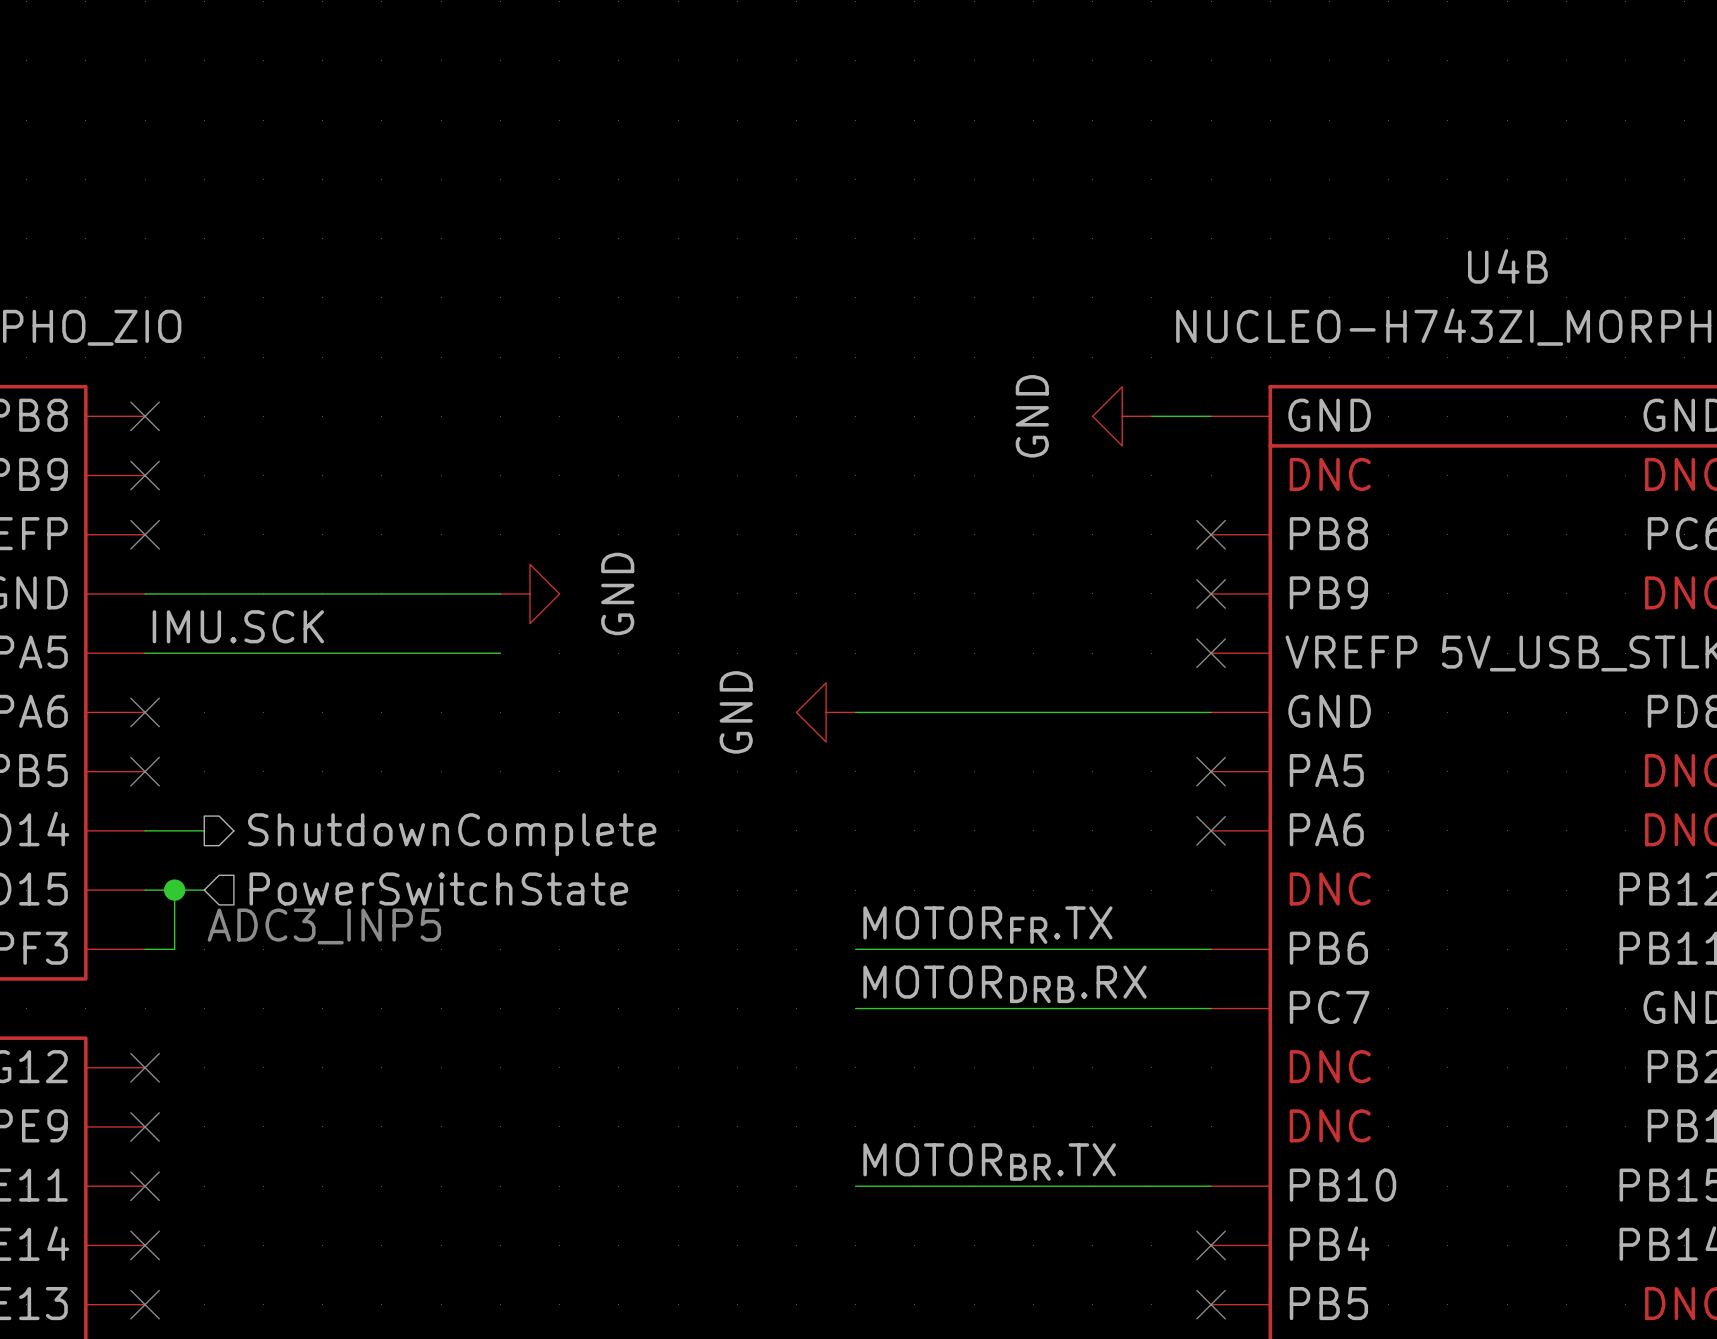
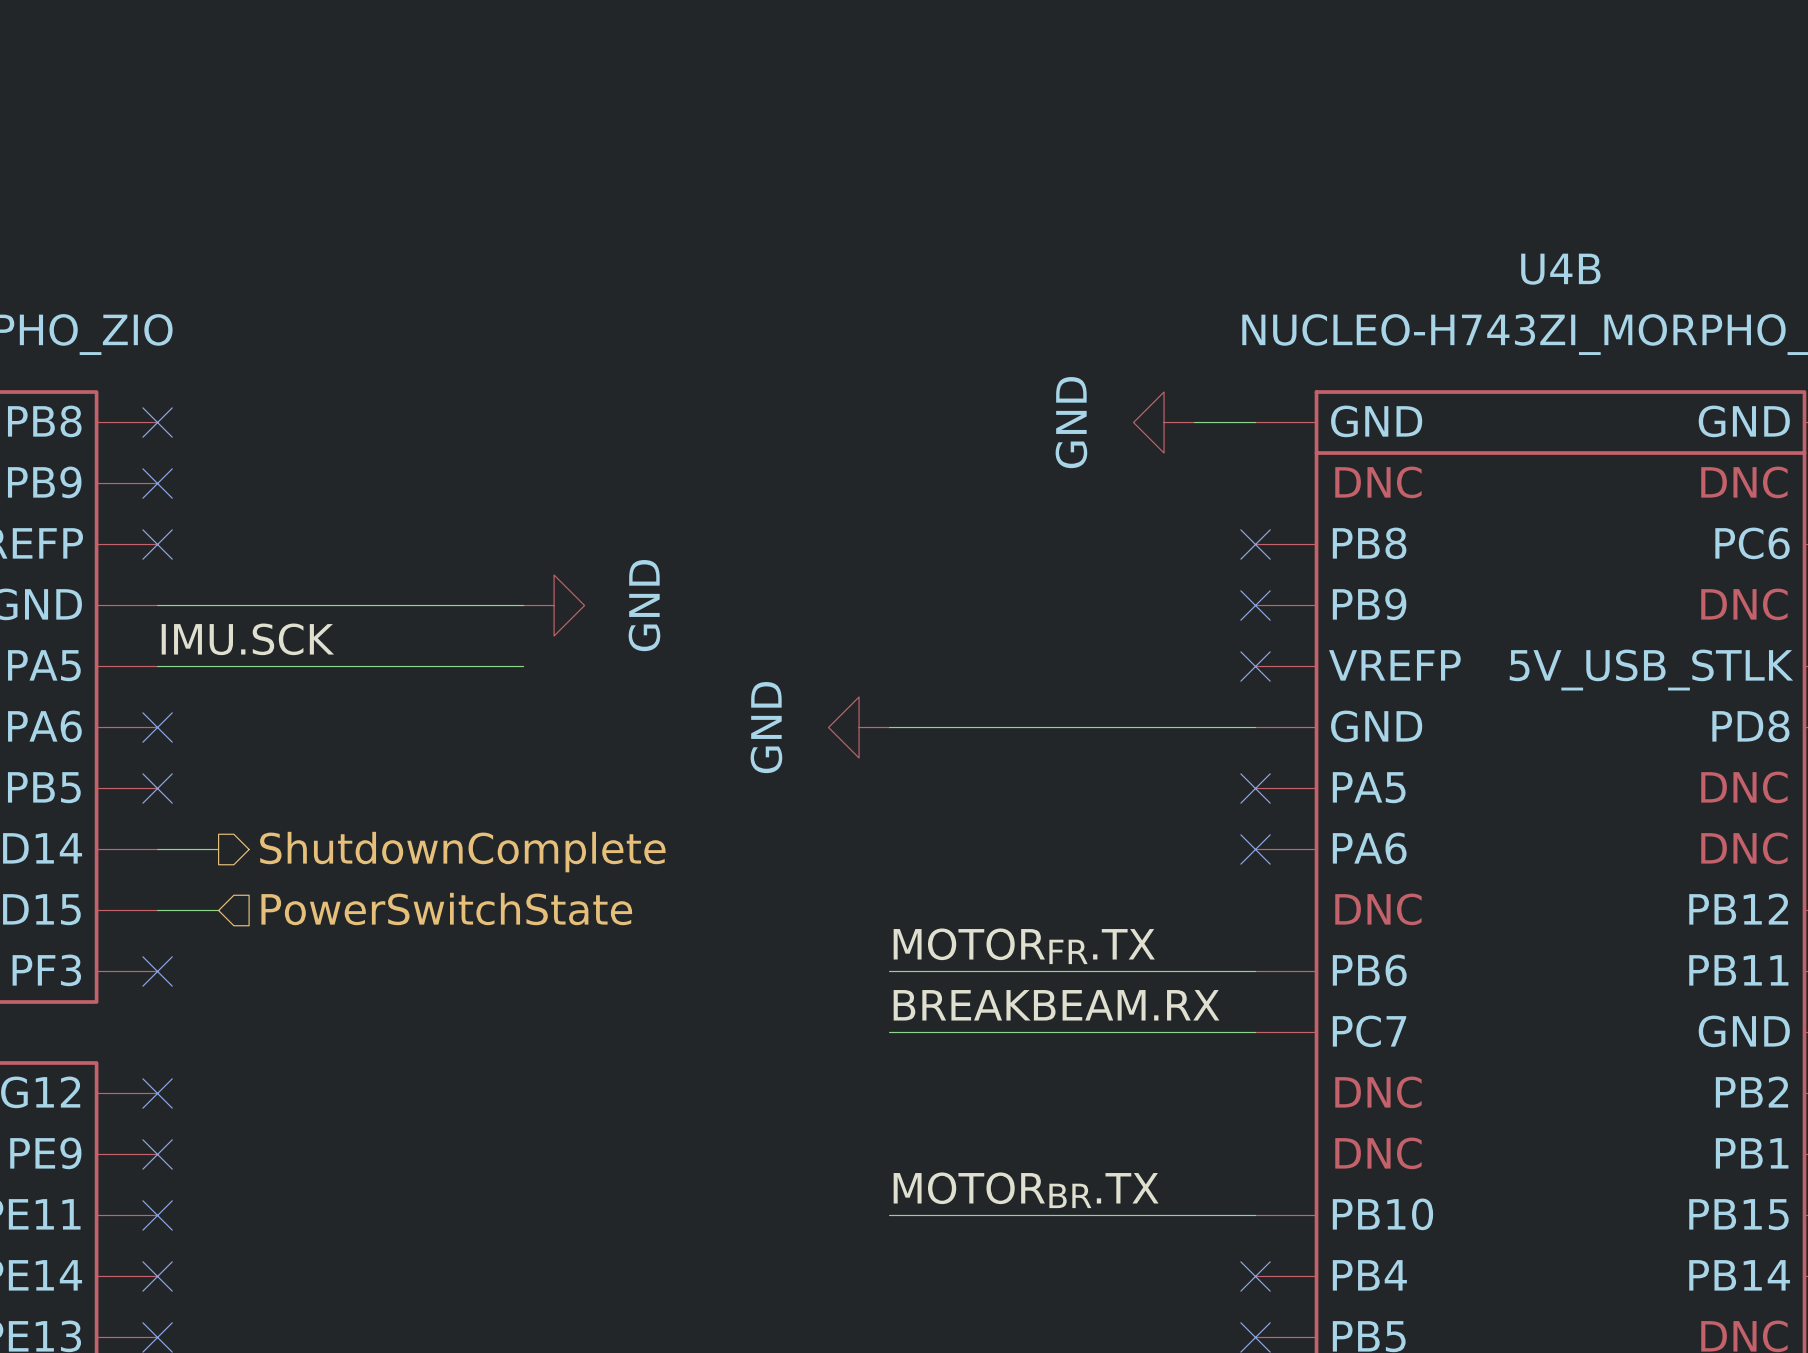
wire: (174, 890) (174, 949) (145, 949) -> none
junction: (174, 890) -> none
text: ADC3_INP5 (324, 926) -> none
no-connect mark: none -> (157, 971)
label: MOTORDRB.RX (1005, 984) -> BREAKBEAM.RX (1056, 1005)

